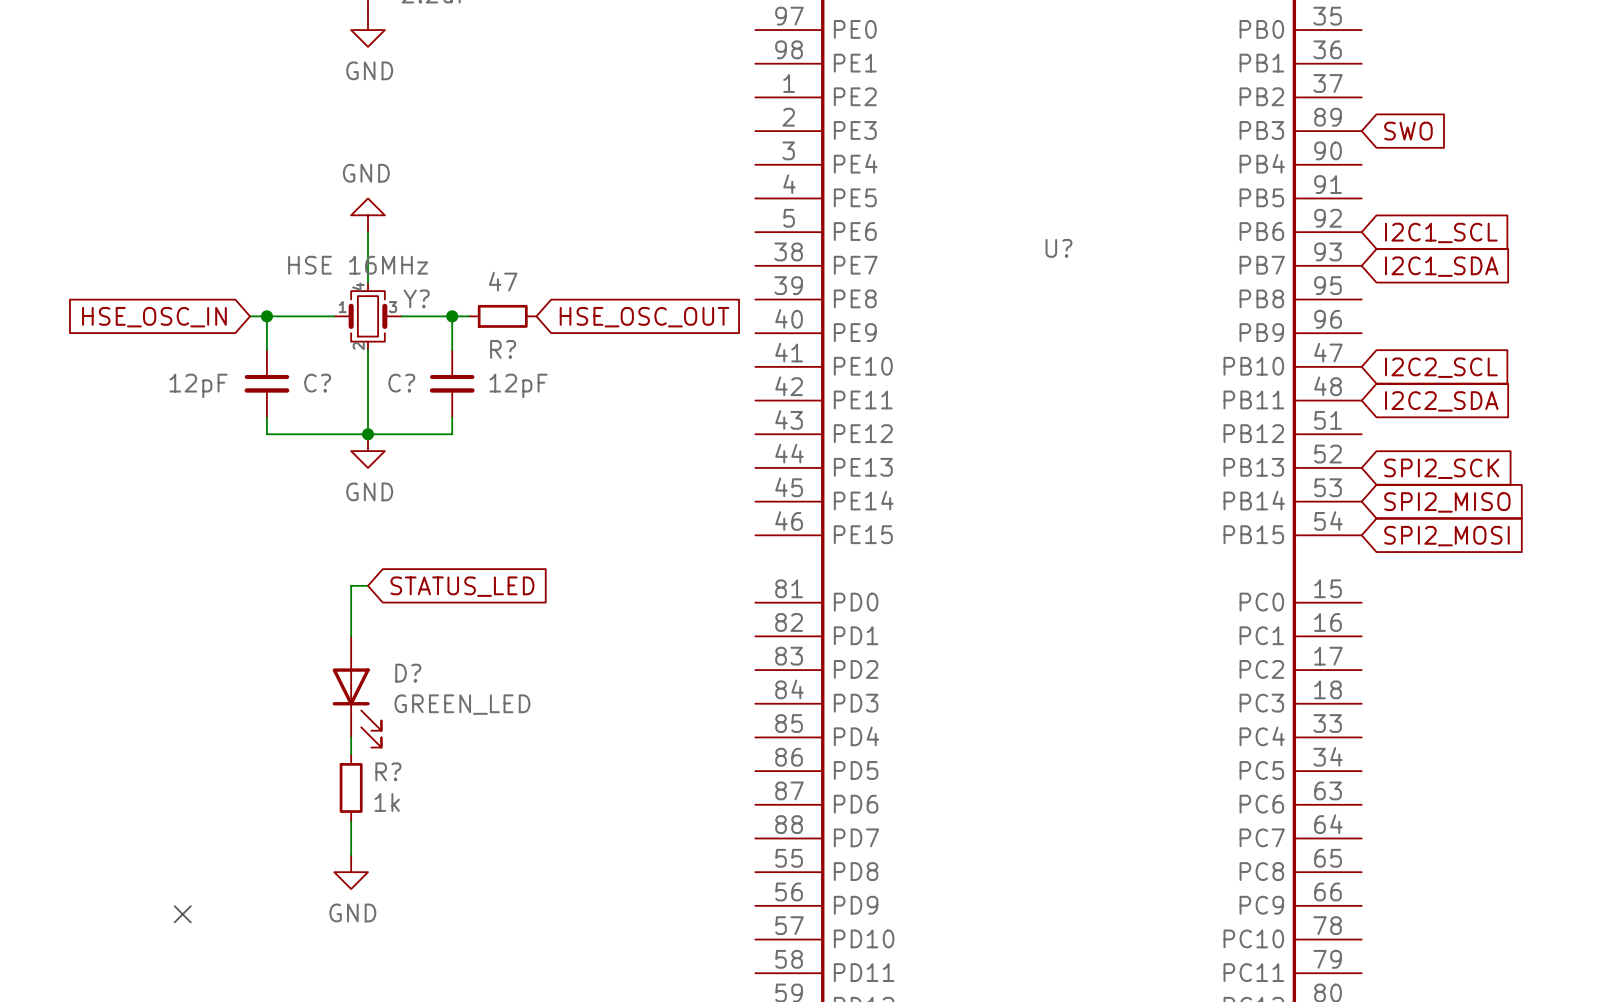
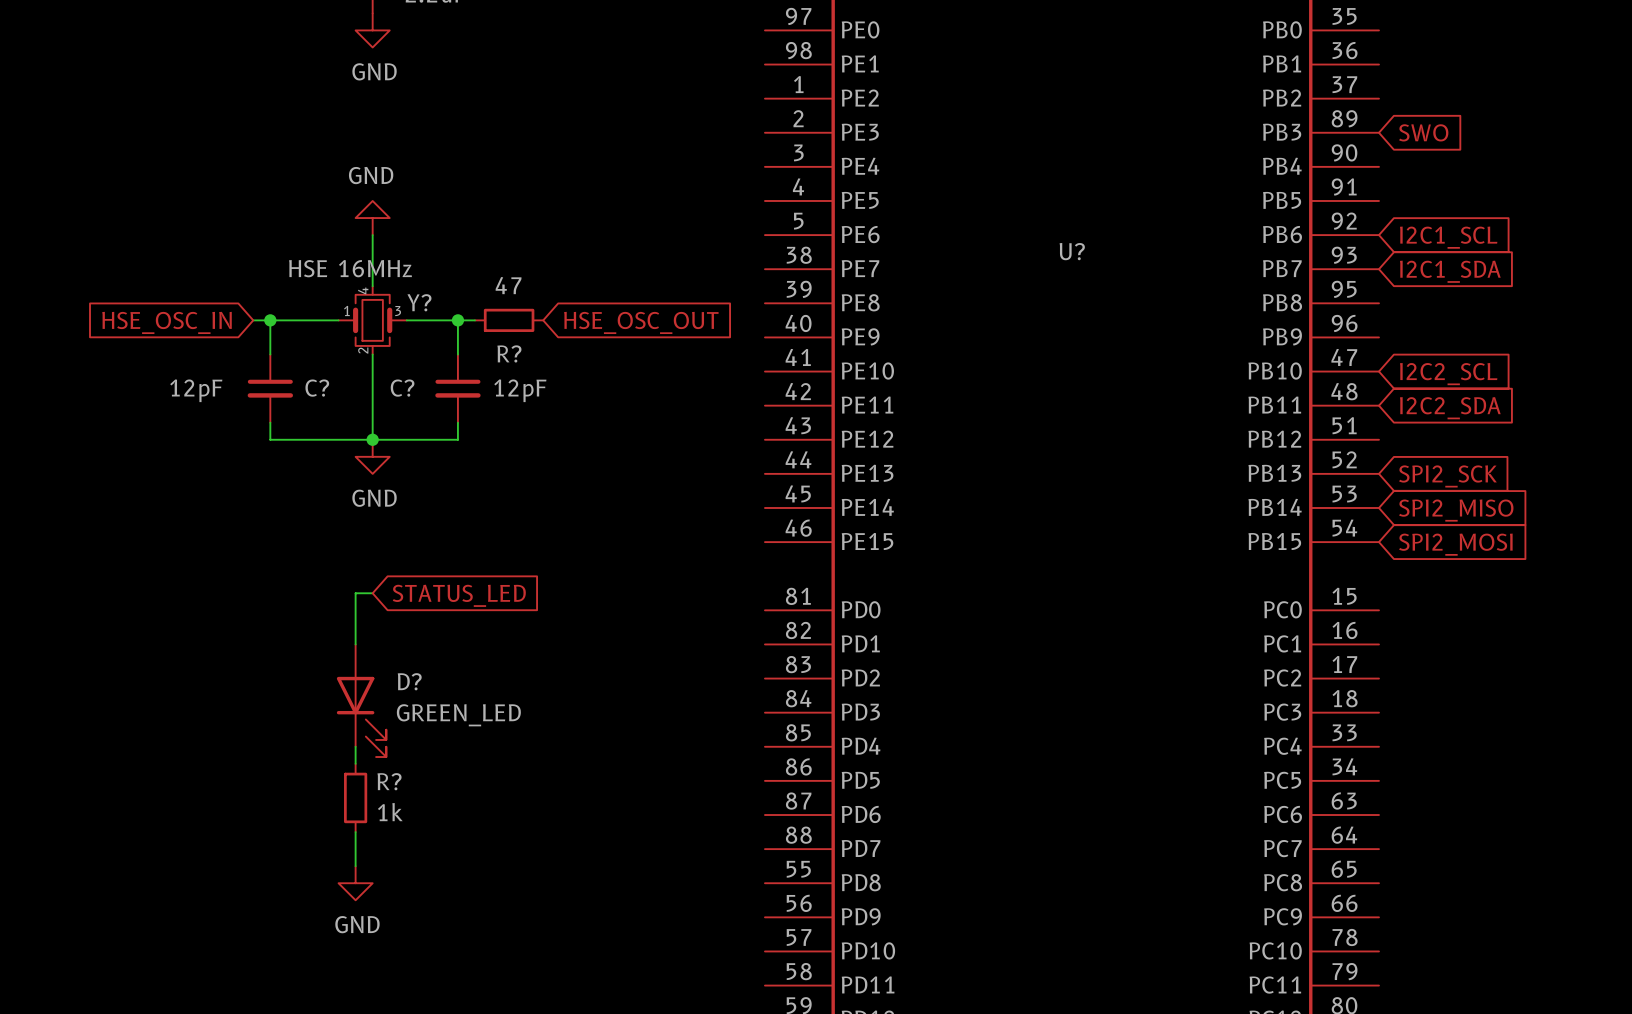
no-connect mark: (182, 914) -> none

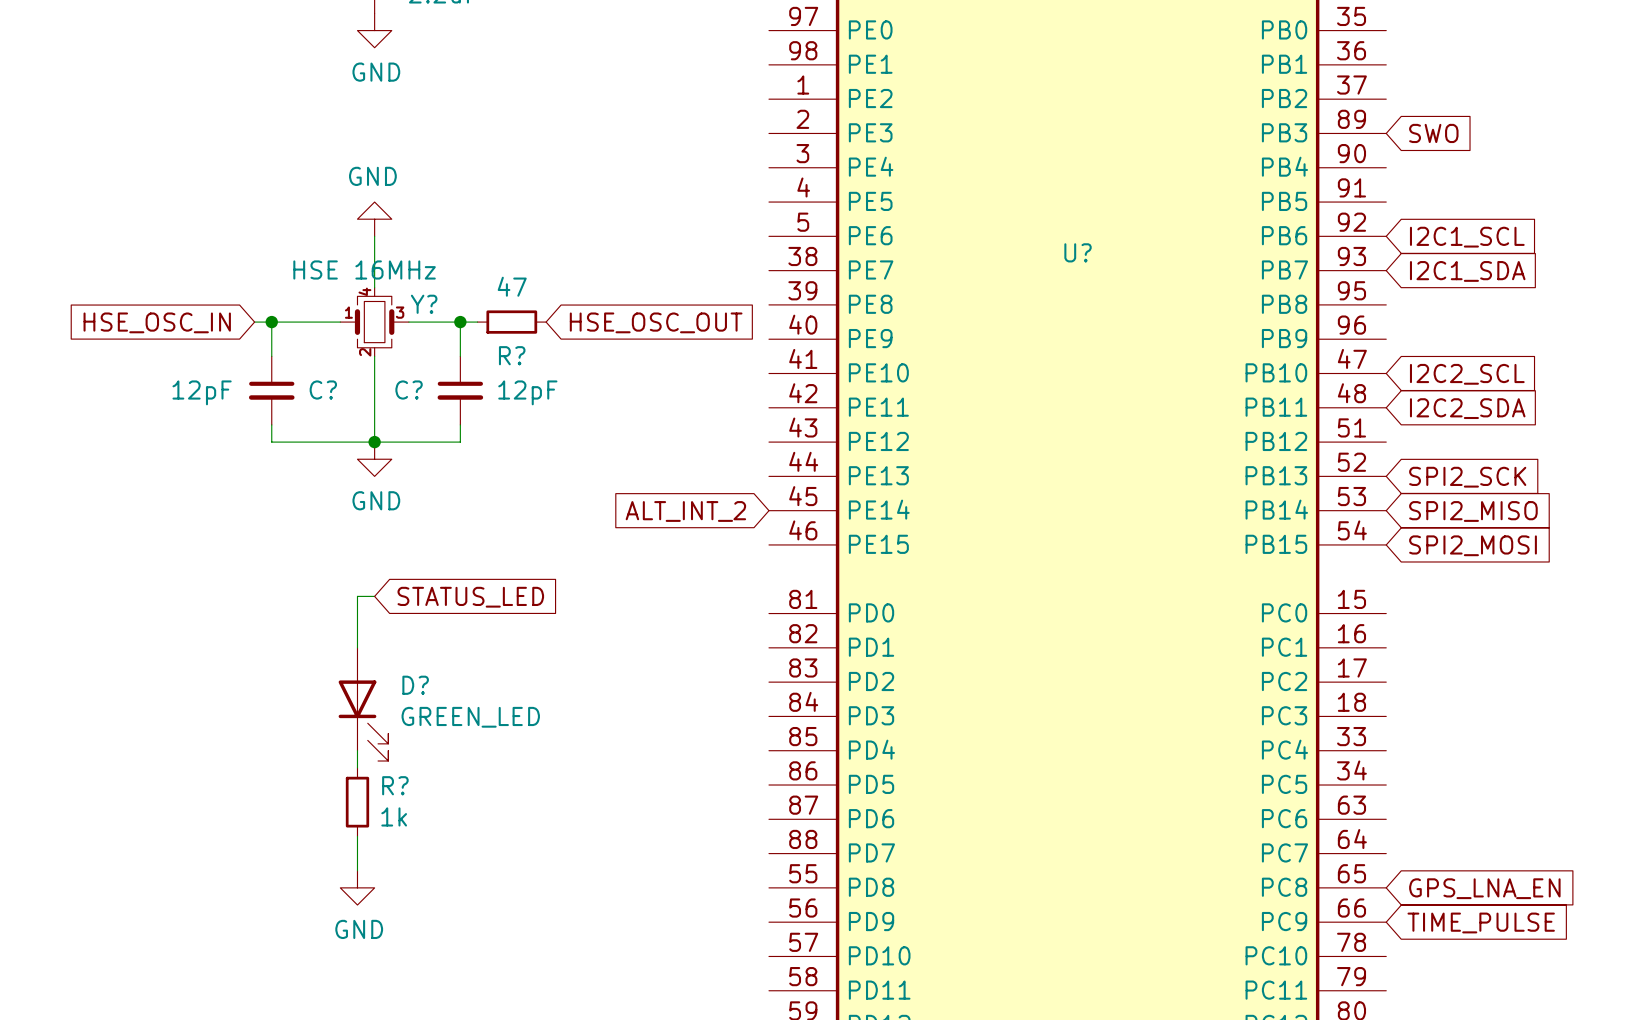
global label: none -> ALT_INT_2 (685, 511)
global label: none -> GPS_LNA_EN (1484, 888)
global label: none -> TIME_PULSE (1481, 922)

